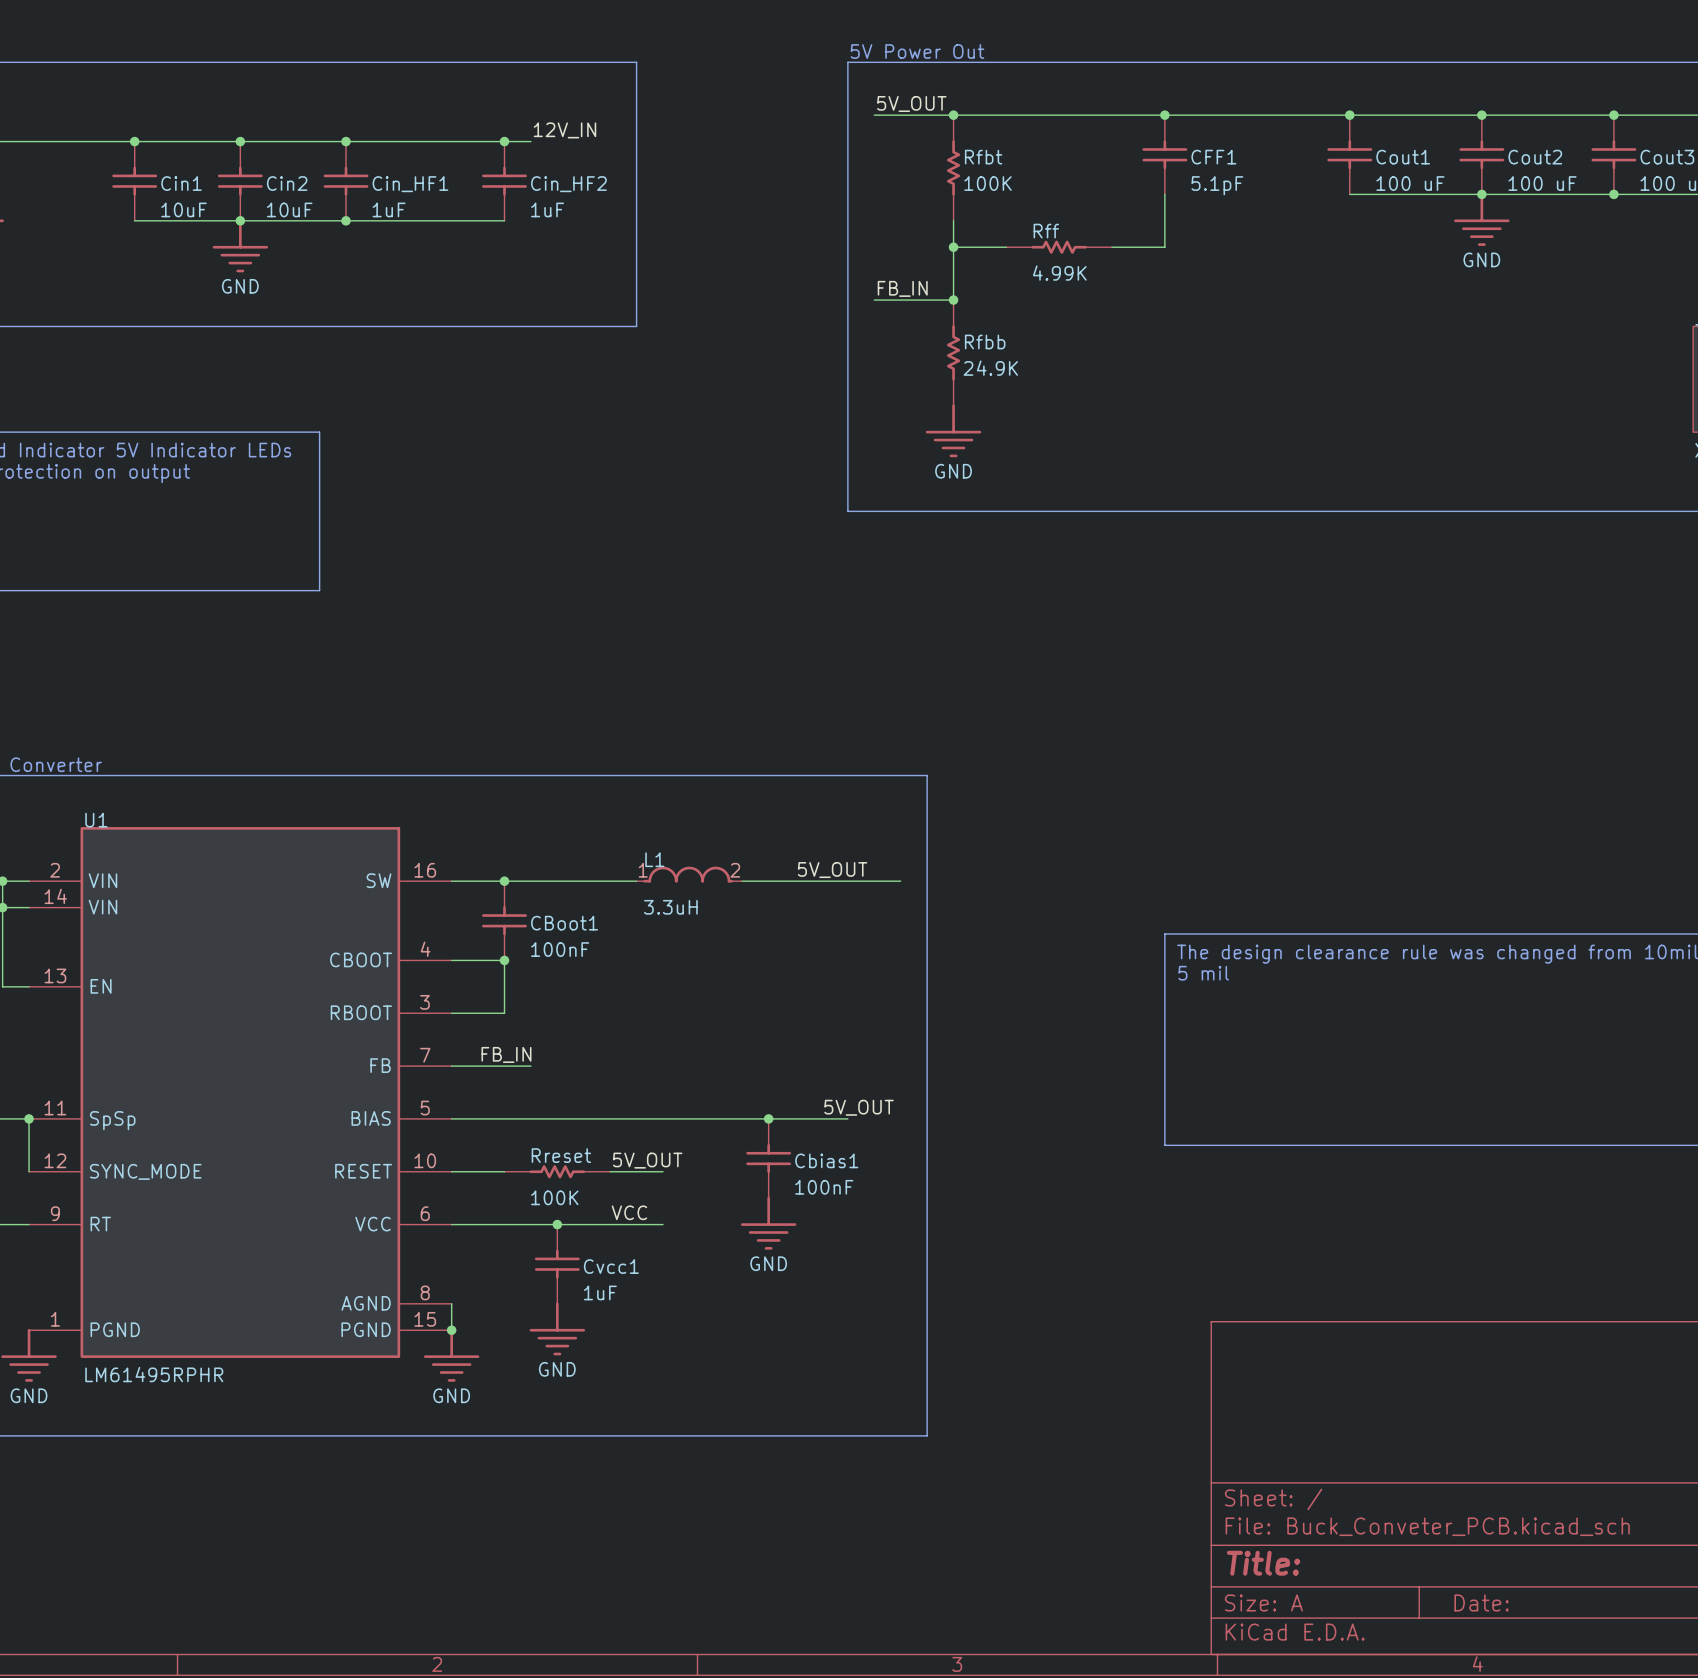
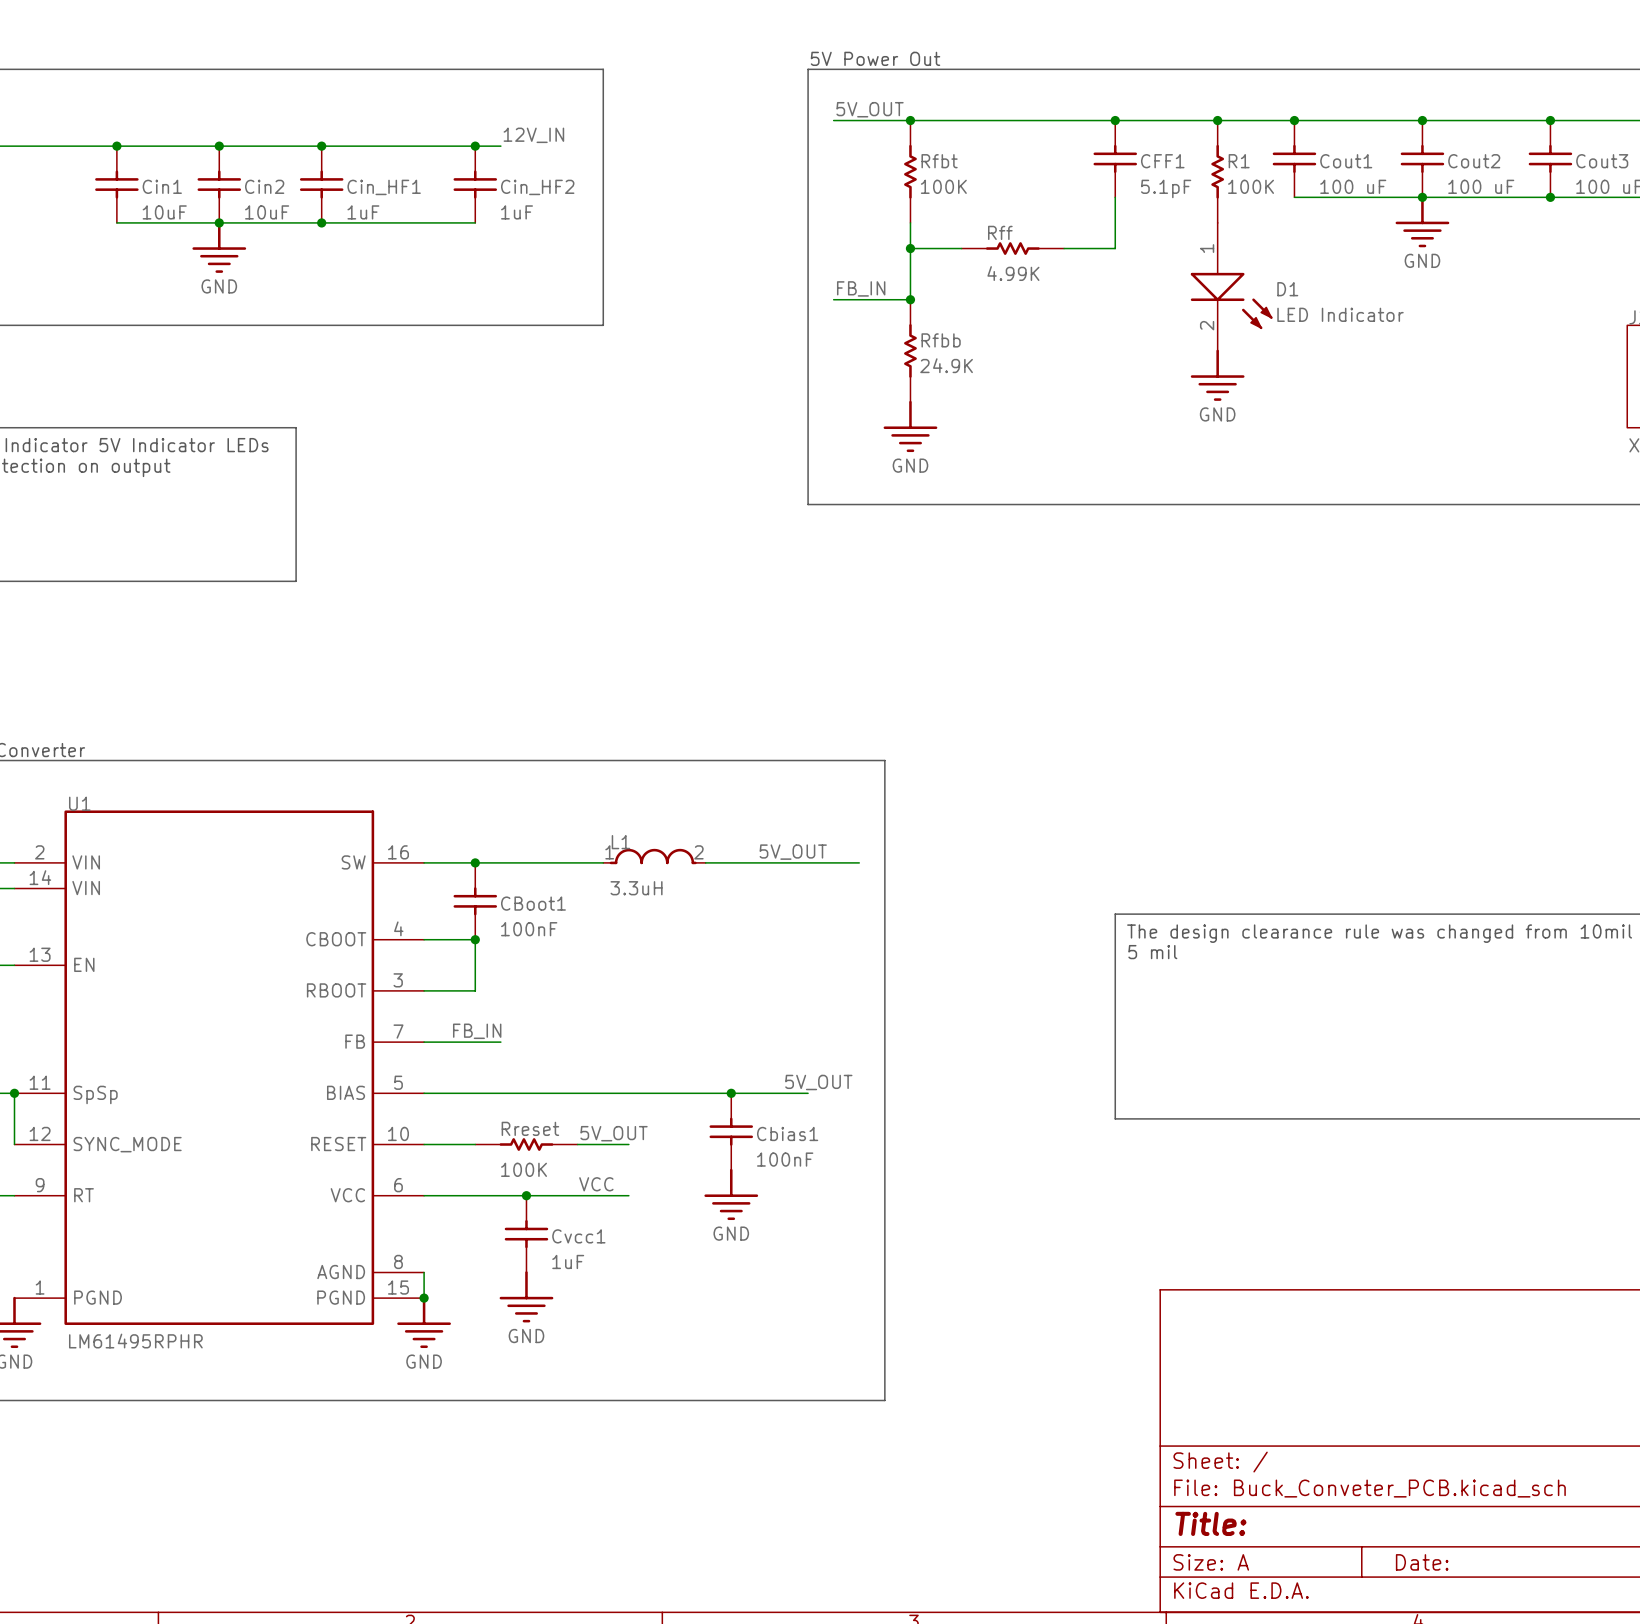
junction: none -> (1217, 120)
R1: none -> 100K (1217, 171)
D1: none -> LED Indicator (1231, 286)
power symbol: none -> GND (1217, 375)

